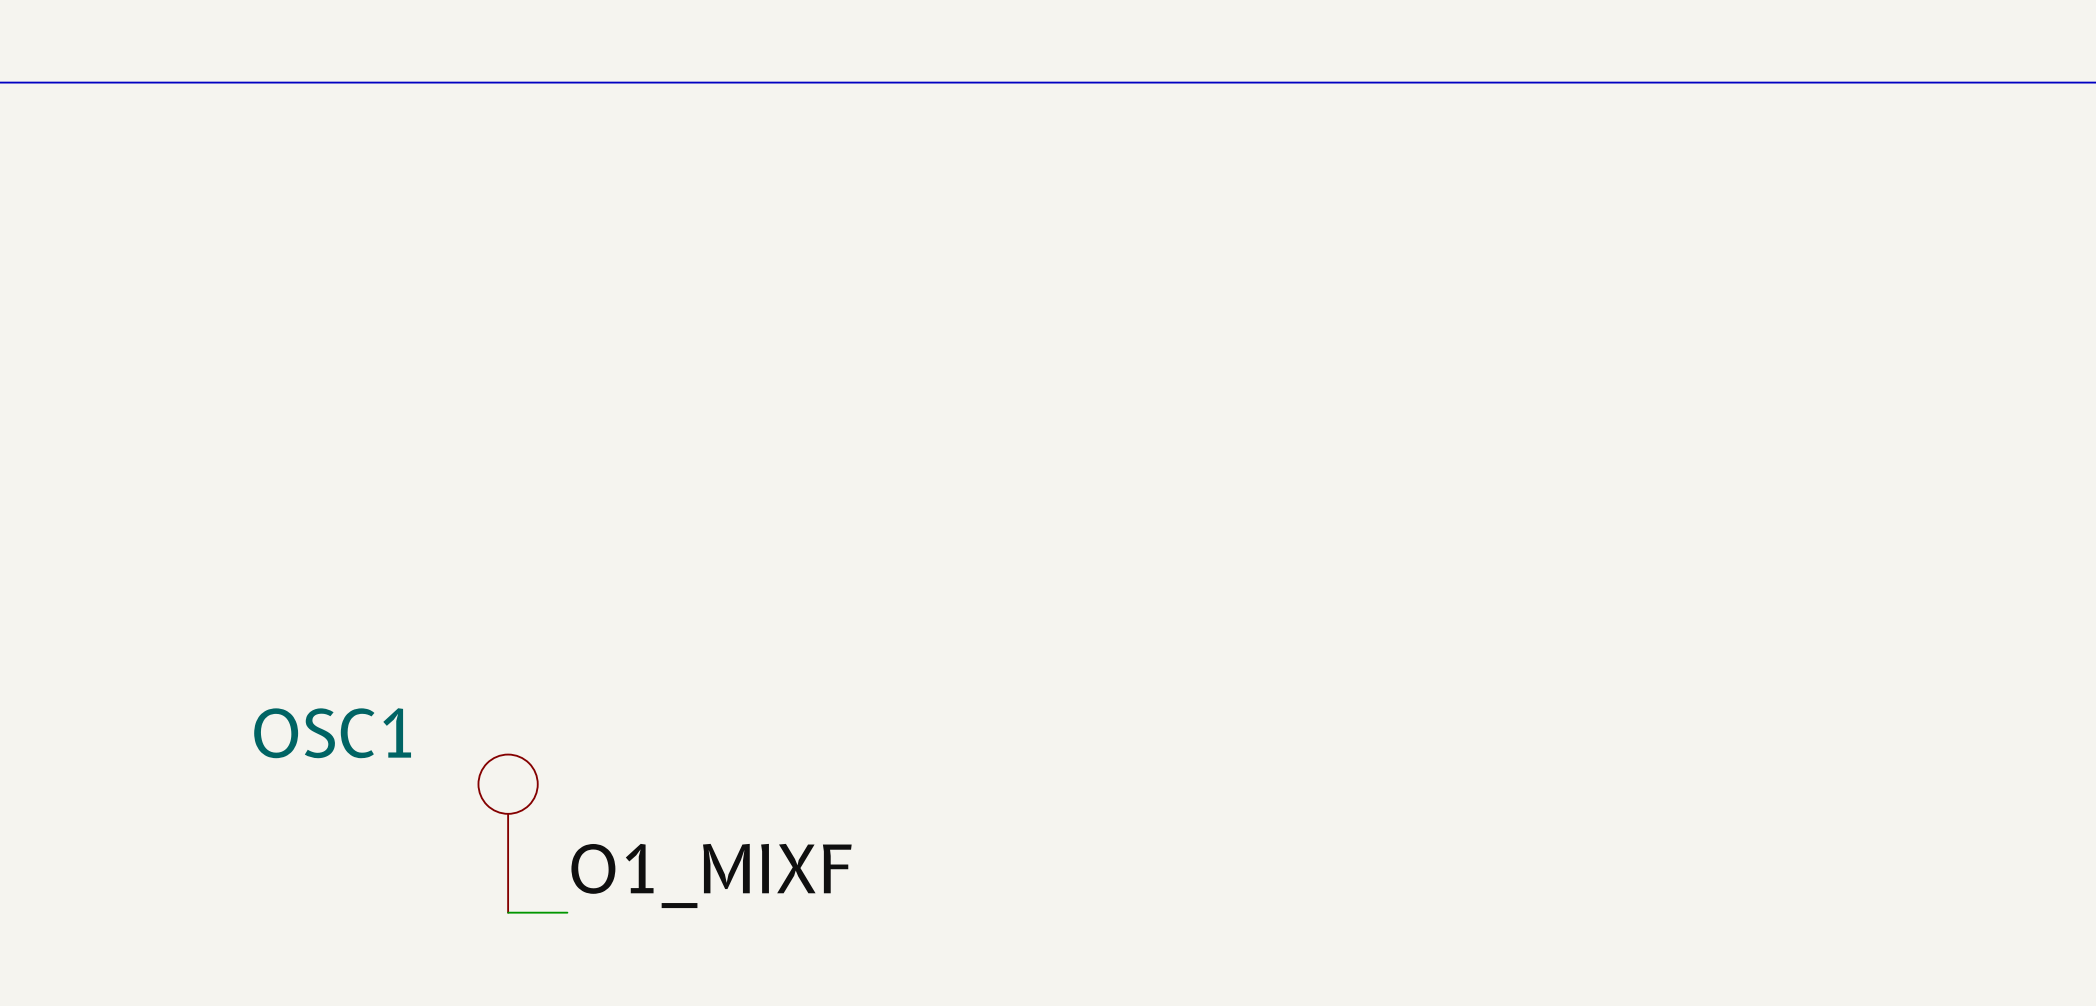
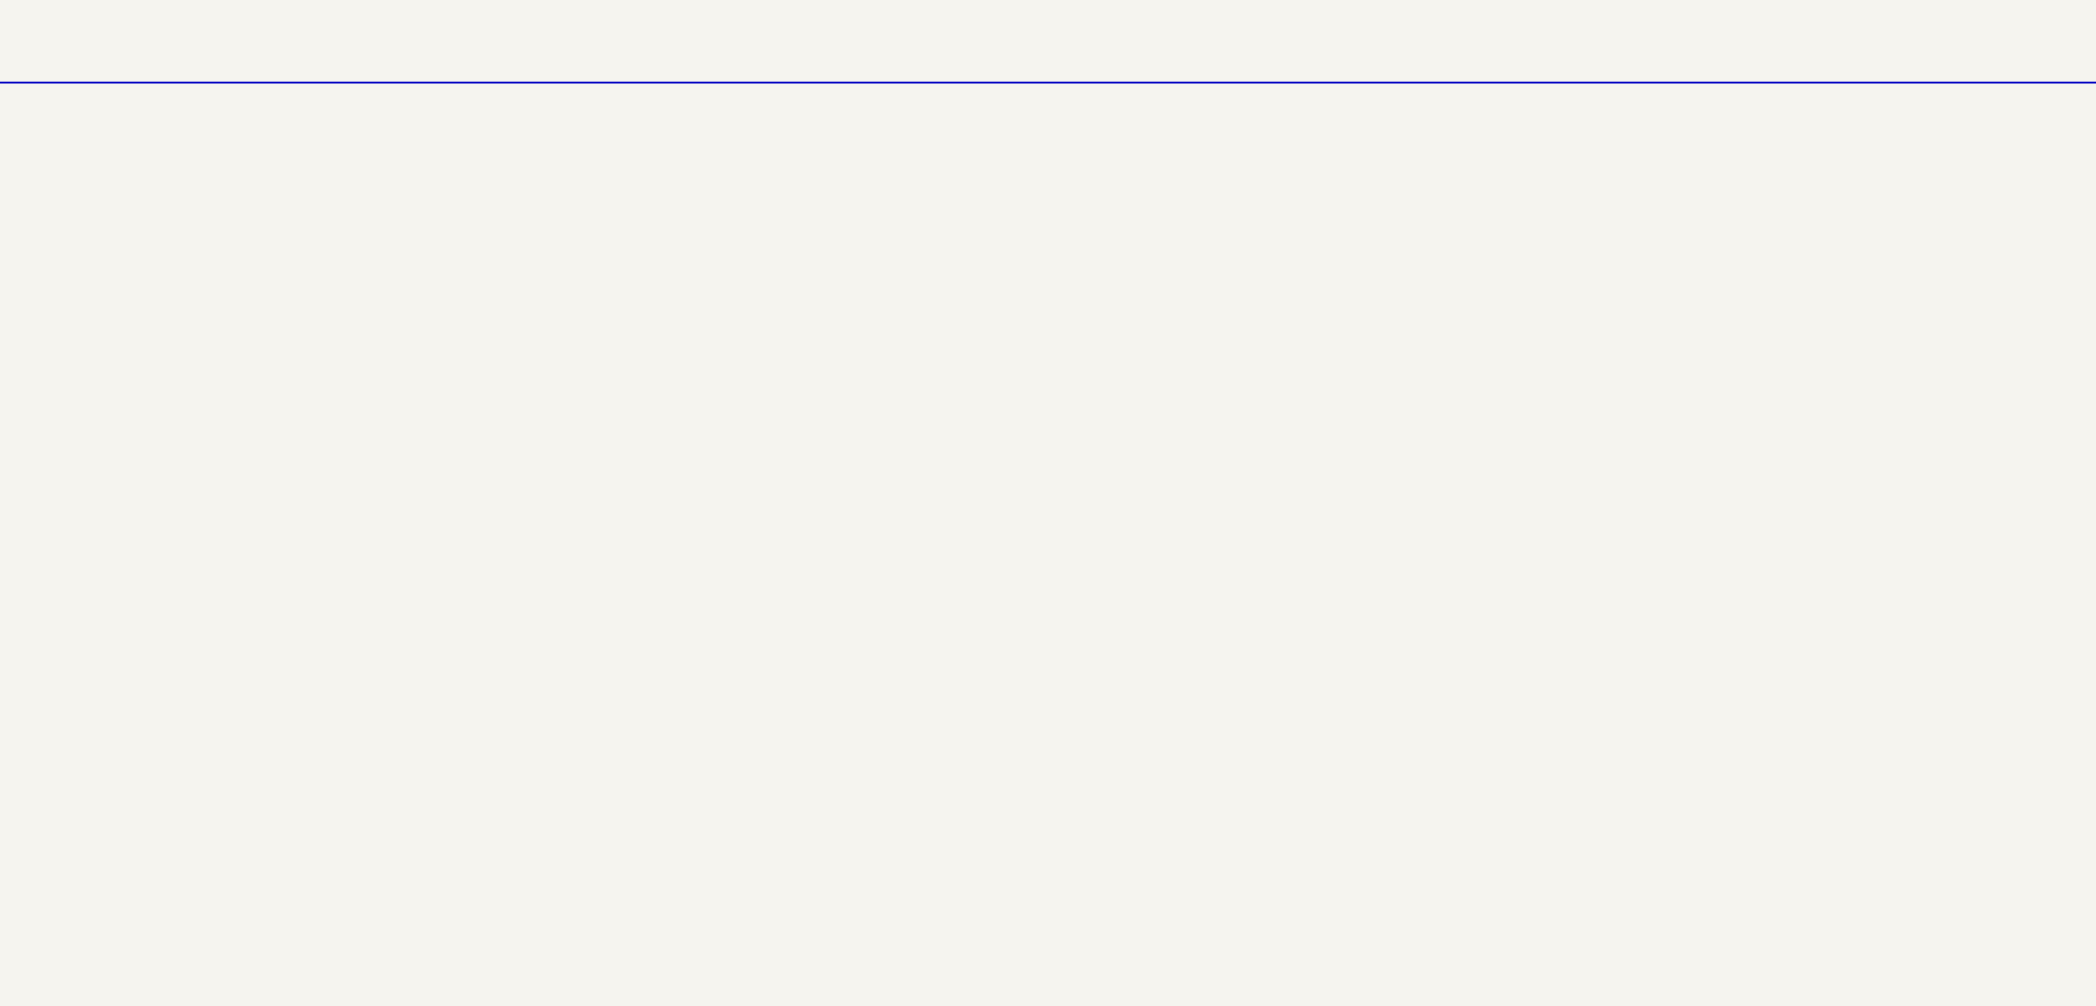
OSC1: (508, 833) -> none
label: O1_MIXF (711, 875) -> none
wire: (508, 912) (567, 912) -> none

